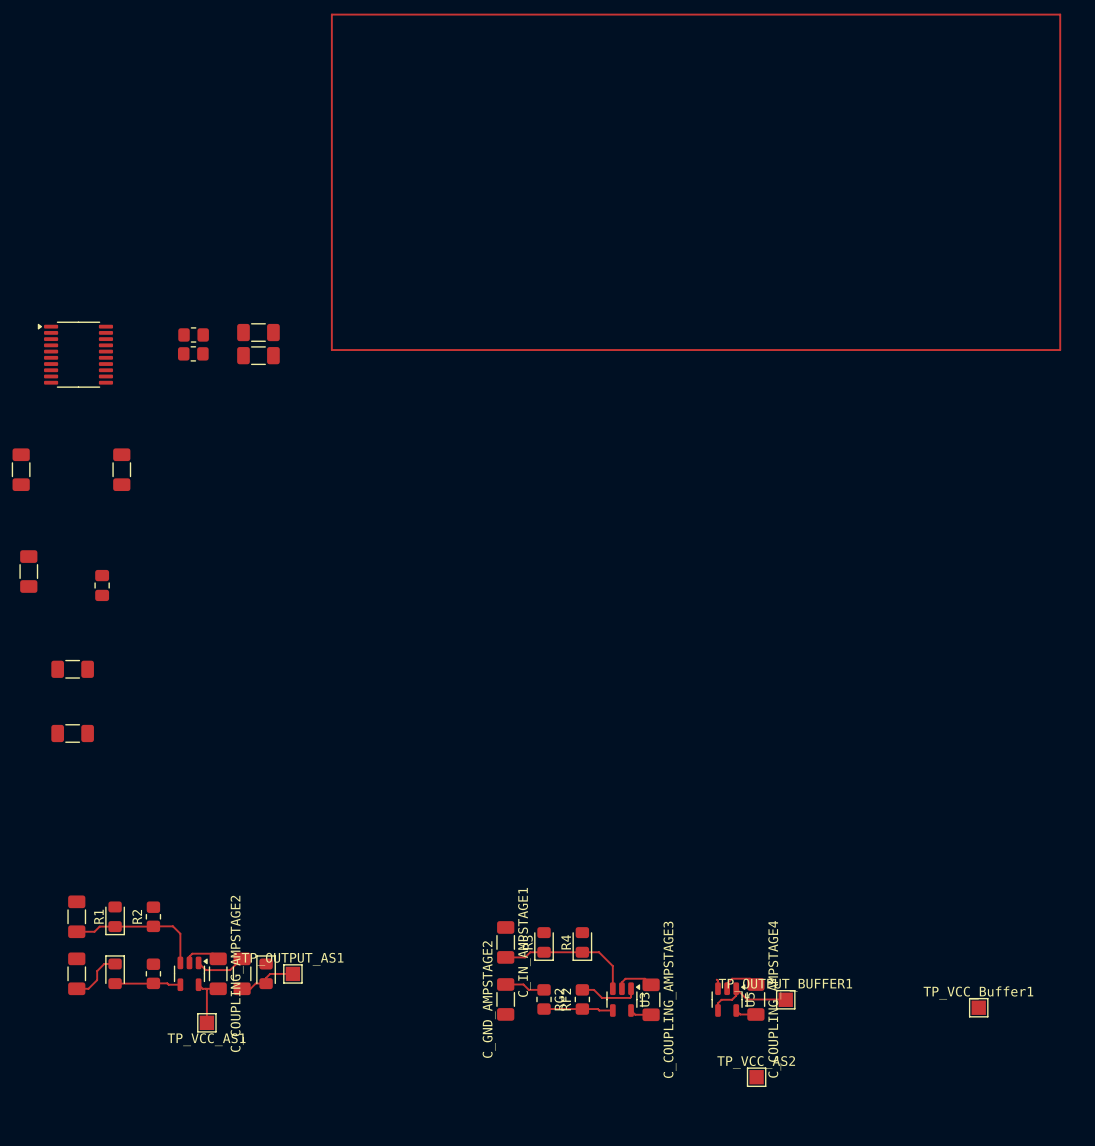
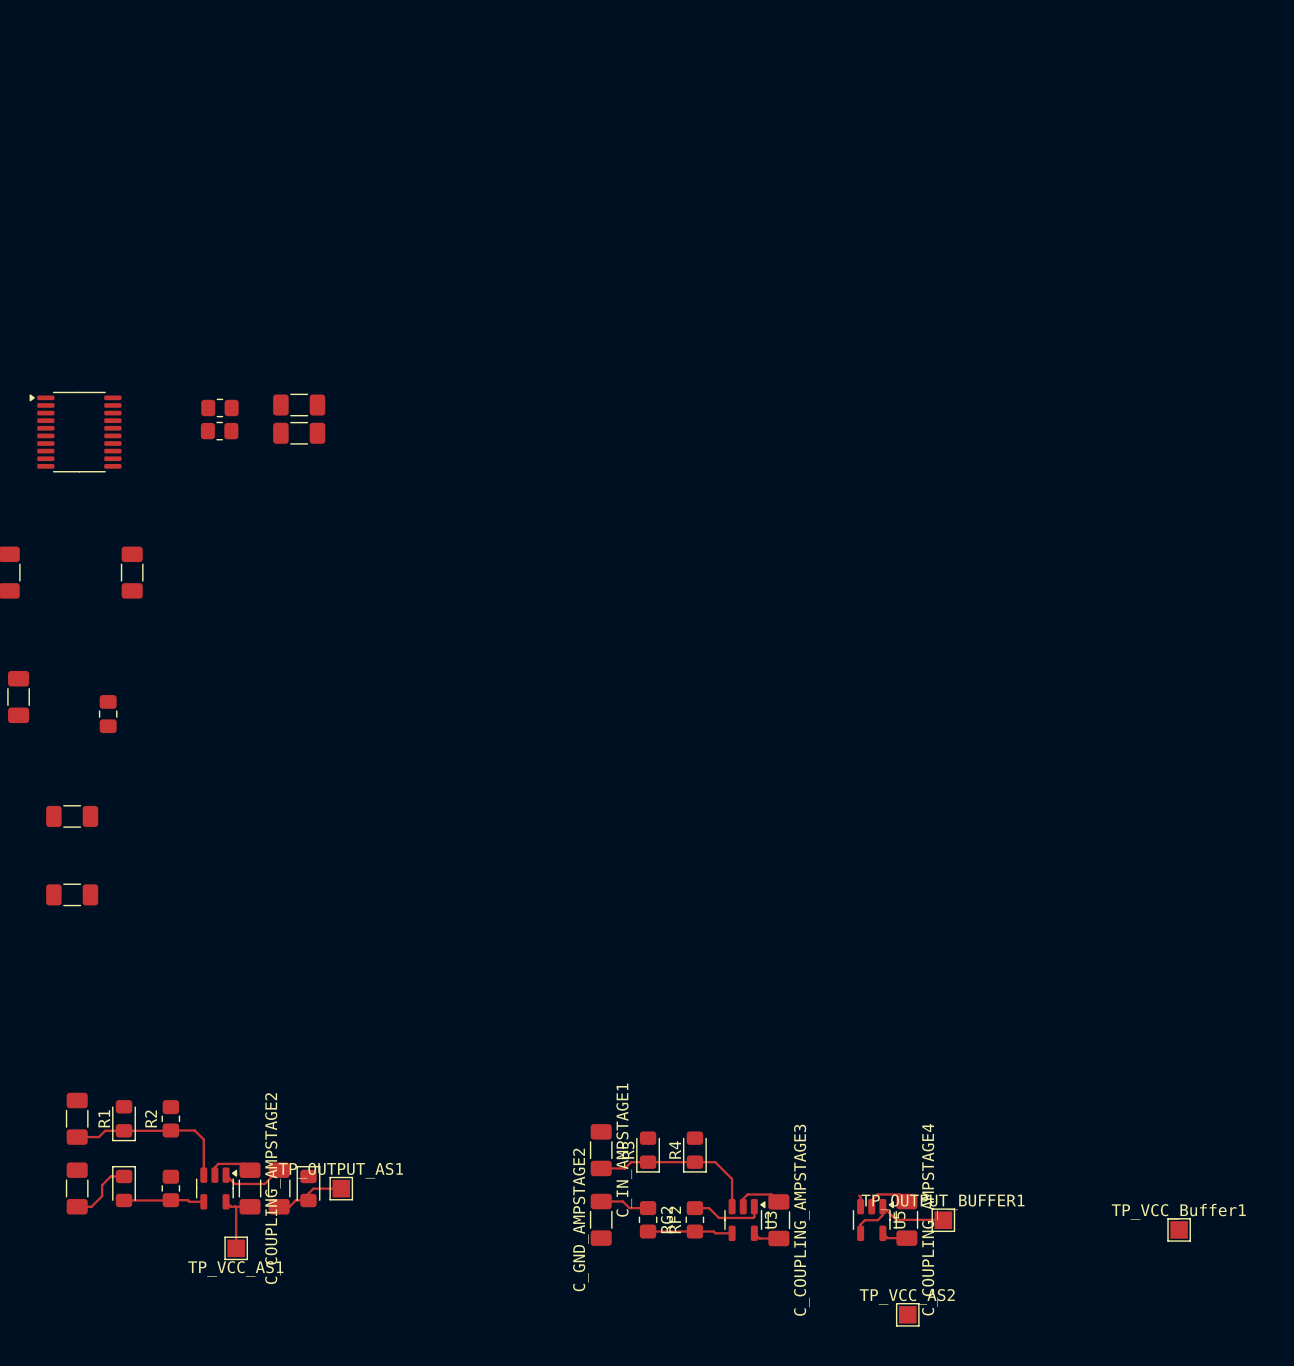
track: (331, 14) (1060, 14) (1060, 350) (331, 350) (331, 14) -> none

